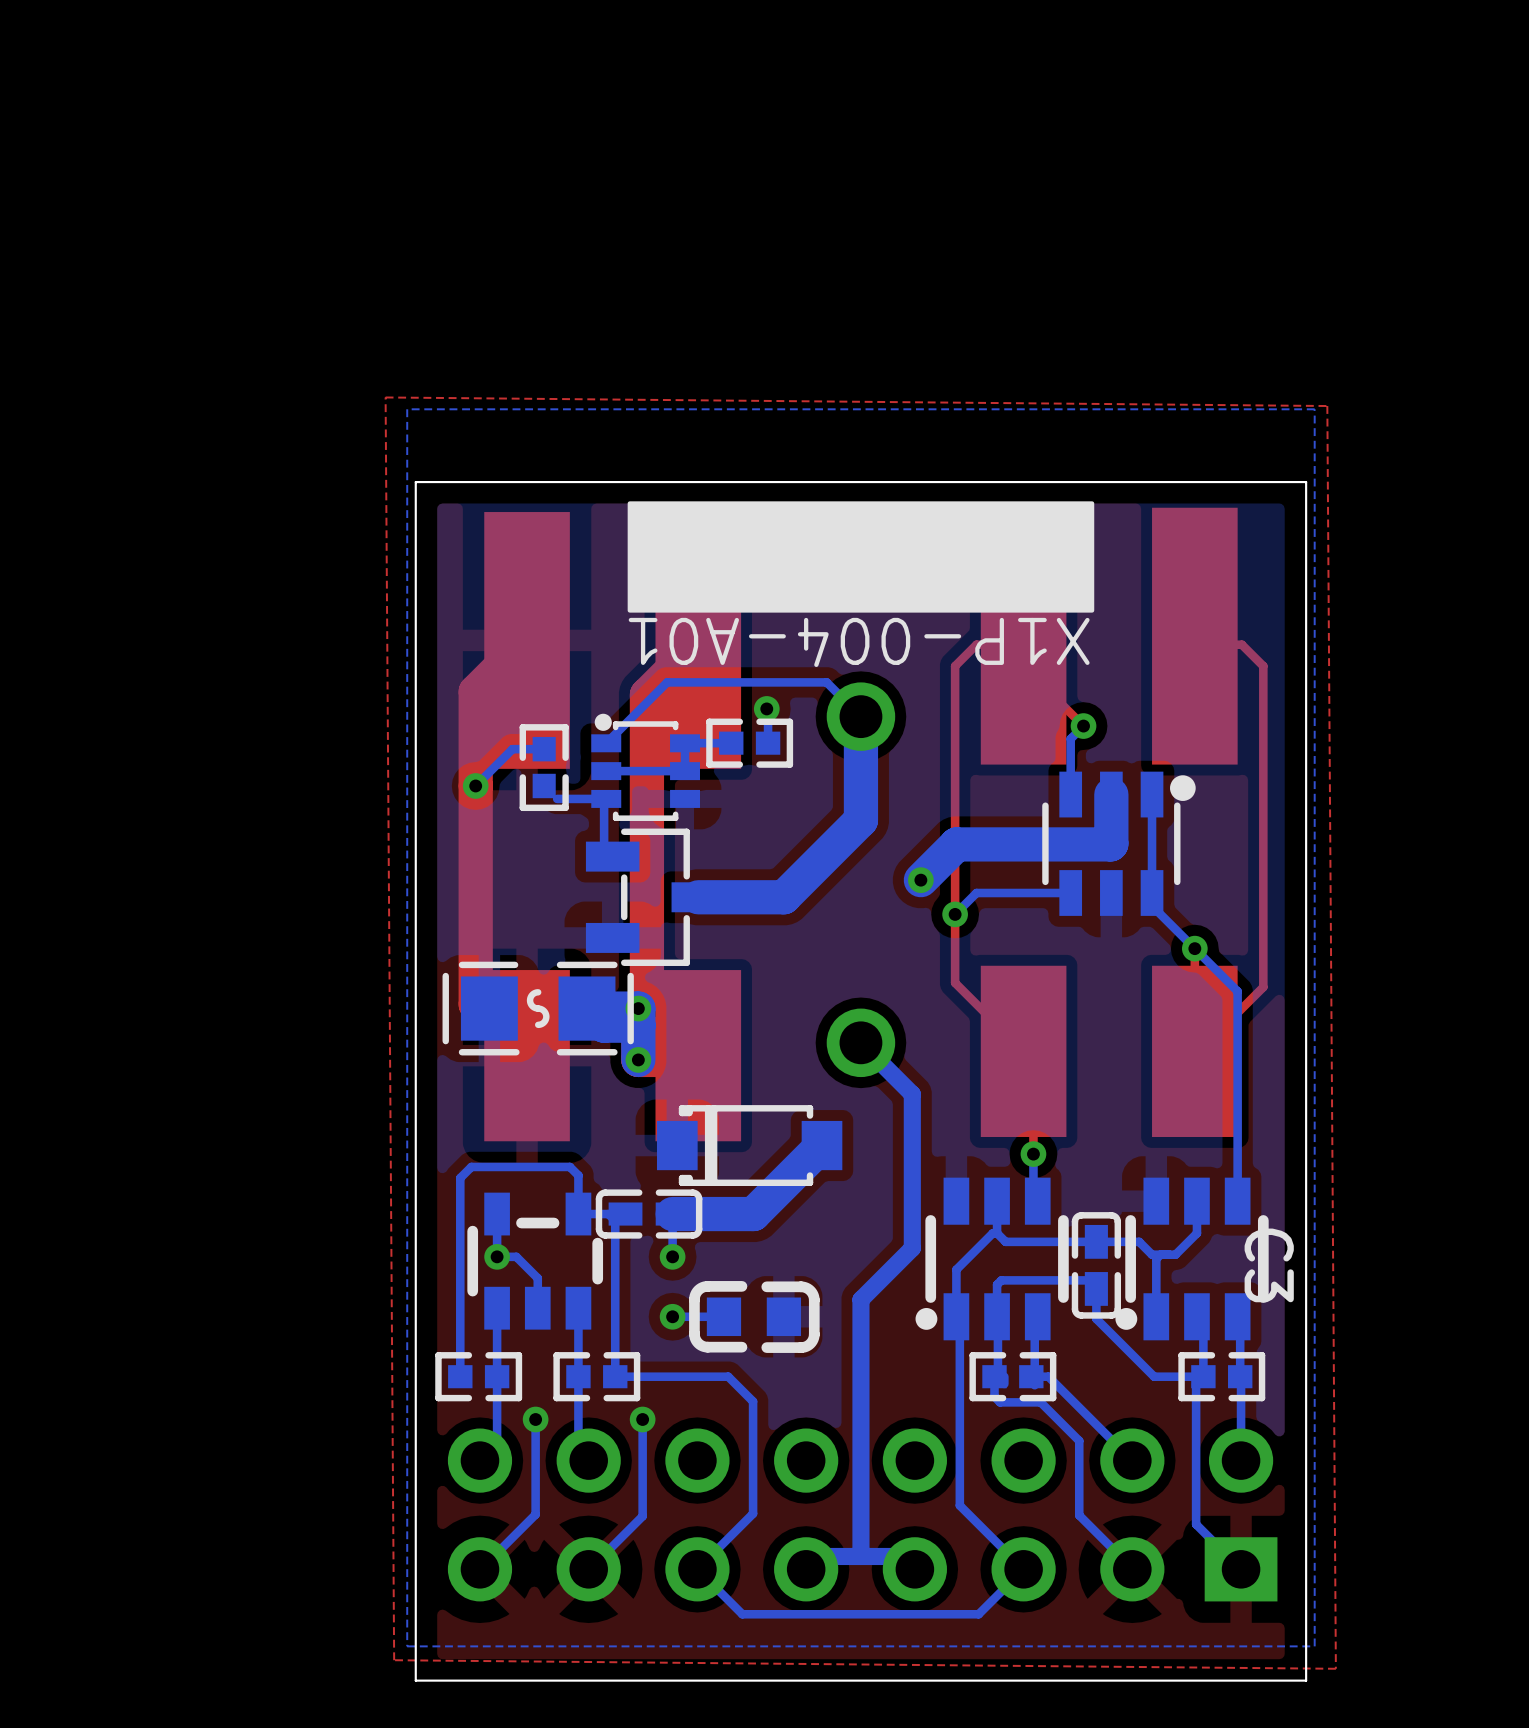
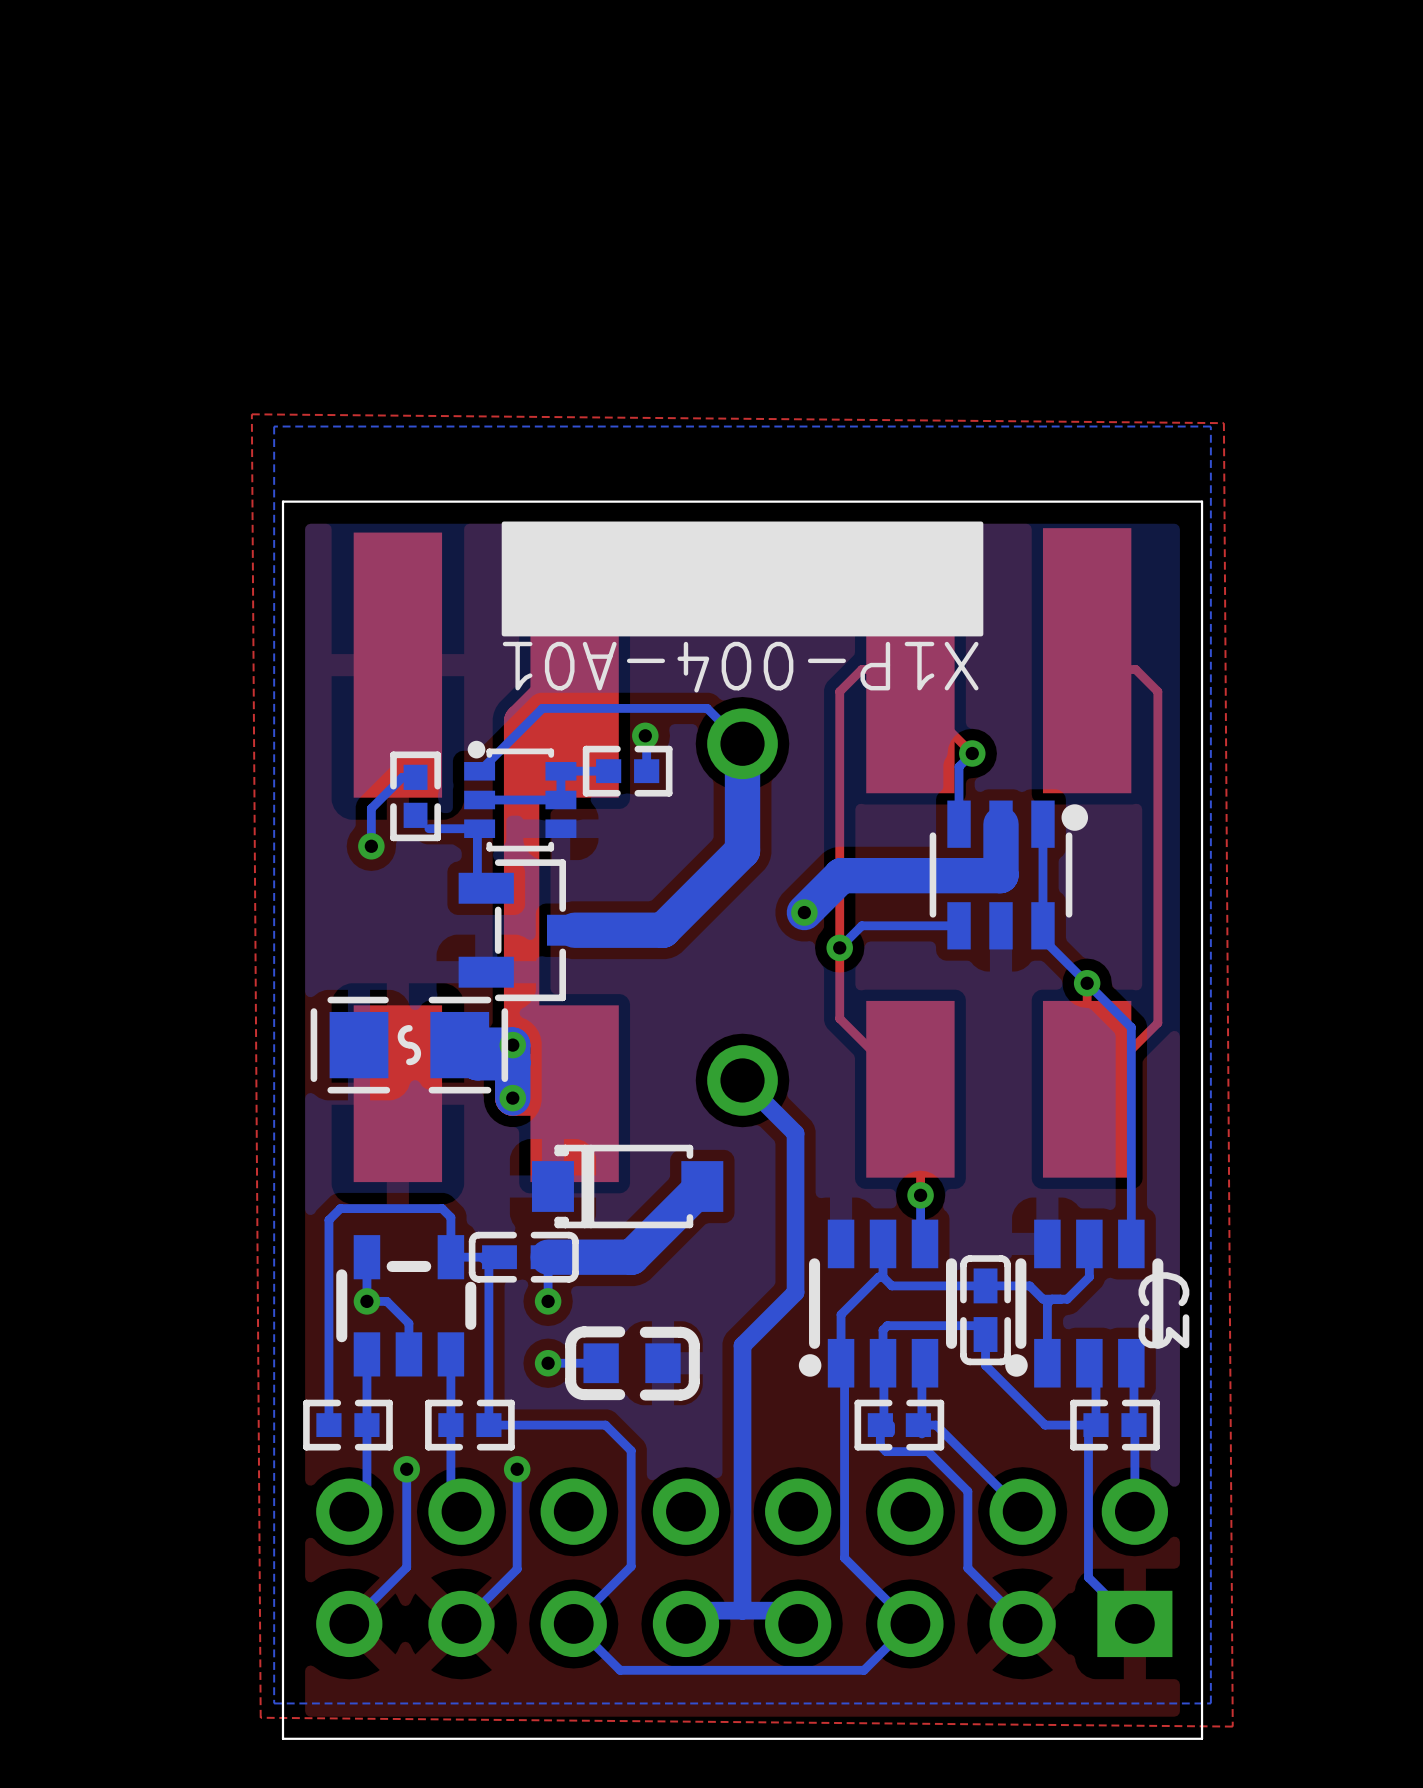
top track: (527, 640) (475, 691) (475, 1004) (527, 1055) -> none
bottom track: (531, 749) (512, 749) (475, 785) -> (402, 777) (371, 808) (371, 846)
via position: (475, 785) -> (371, 846)

